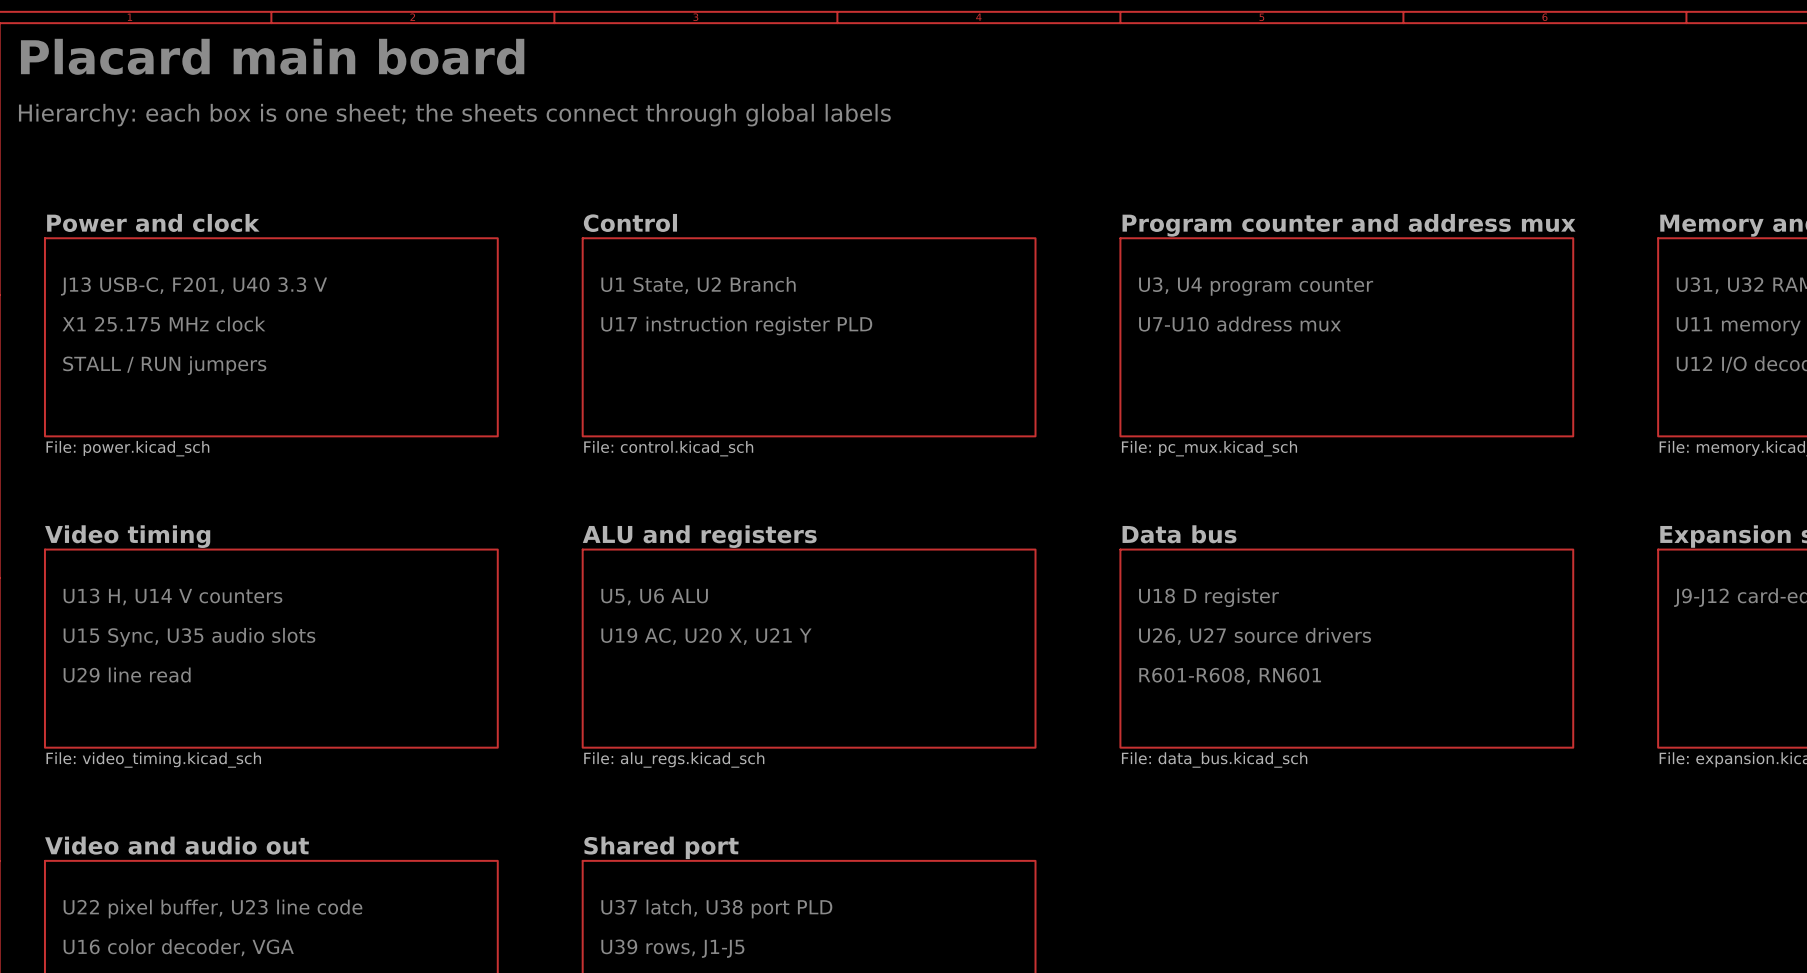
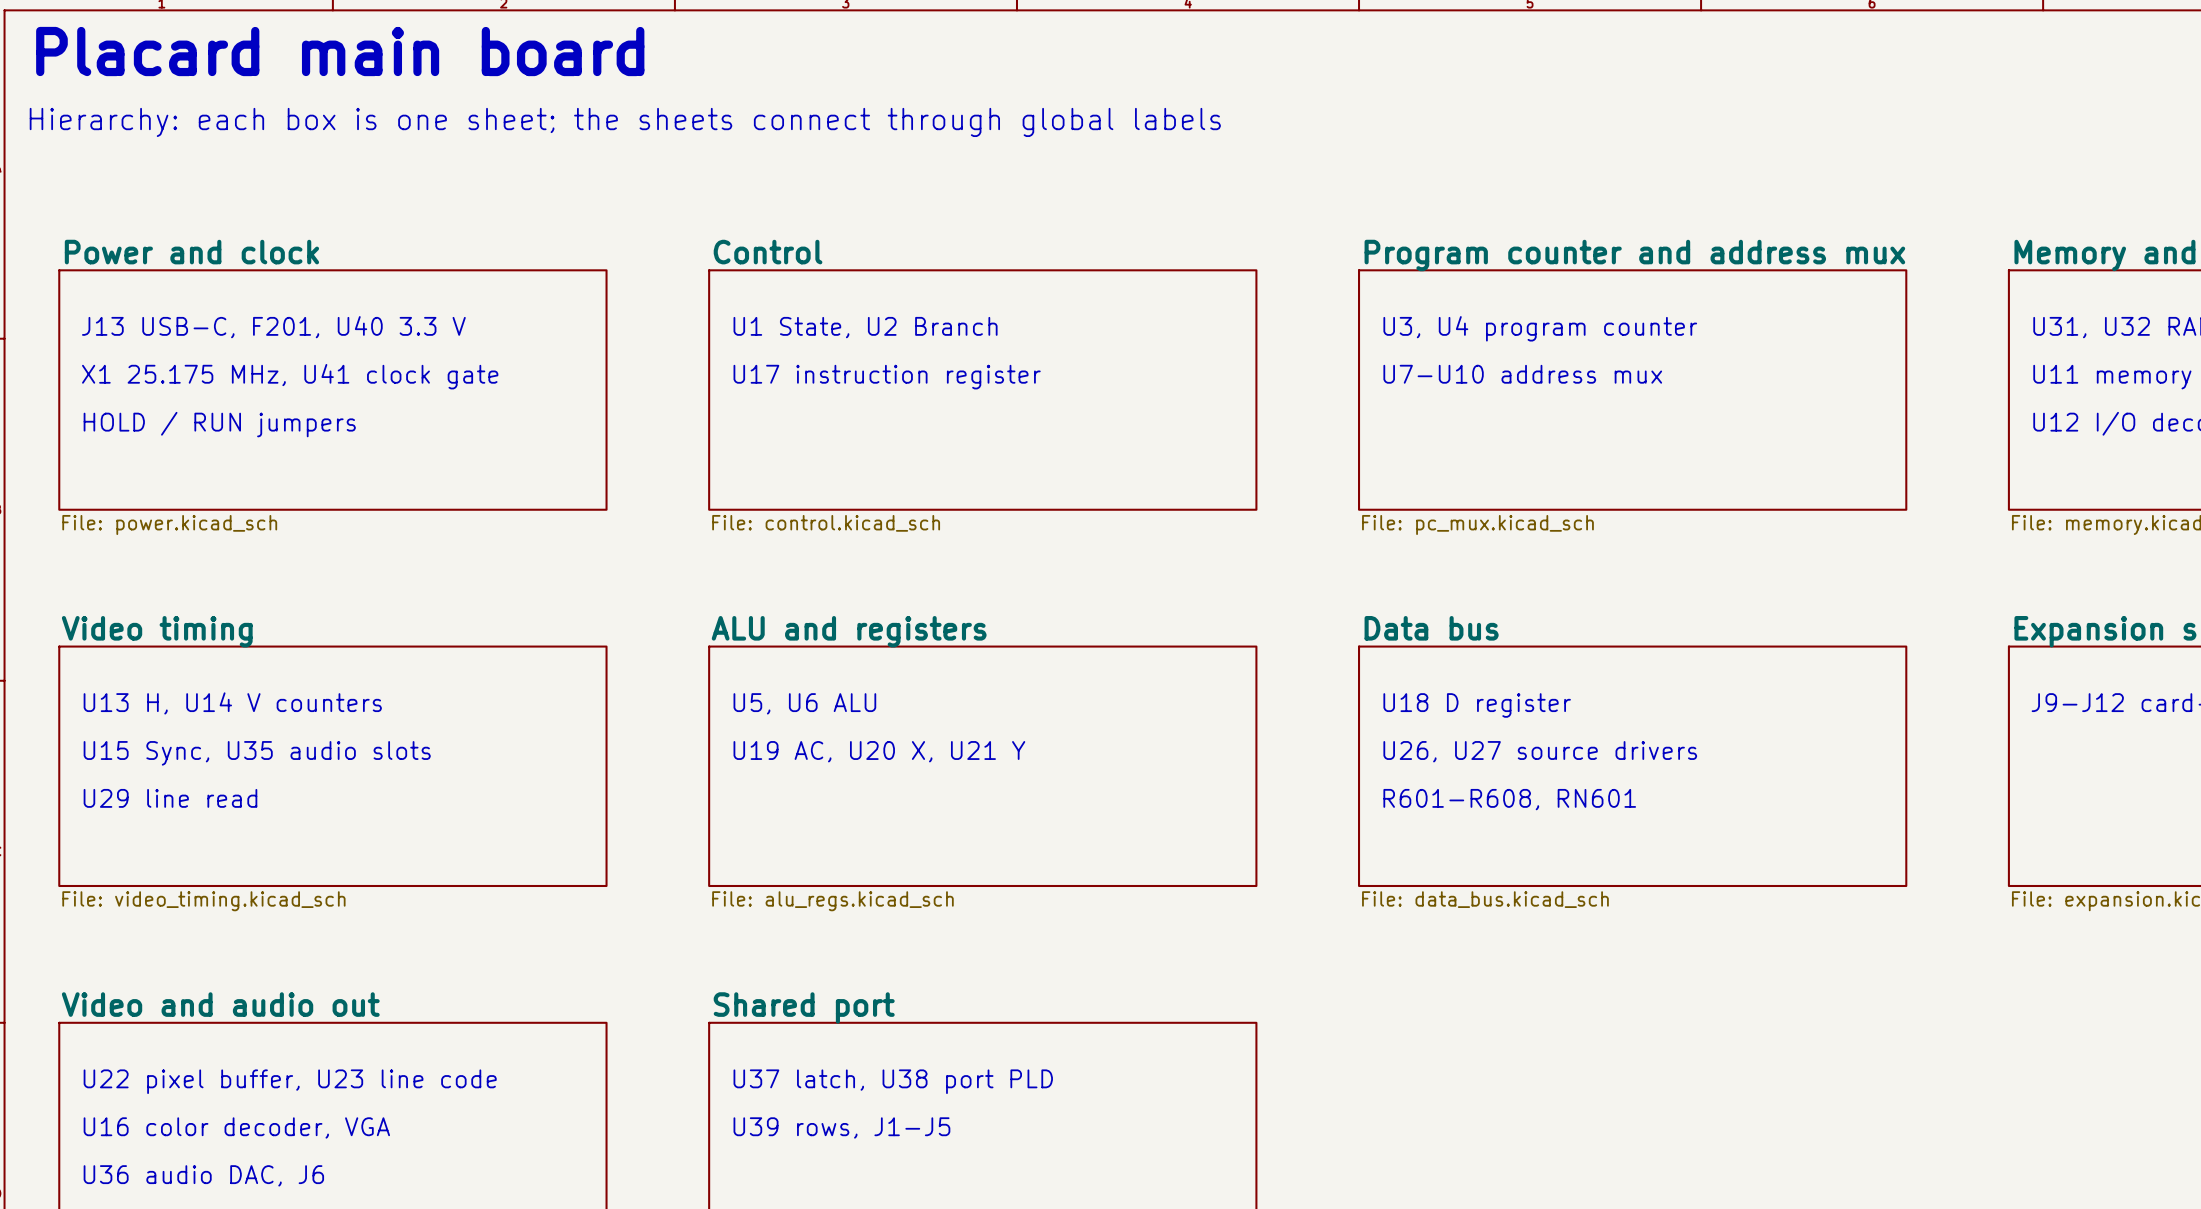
text: X1 25.175 MHz clock (163, 324) -> X1 25.175 MHz, U41 clock gate (290, 376)
text: U17 instruction register PLD (736, 325) -> U17 instruction register (887, 377)
text: STALL / RUN jumpers (164, 365) -> HOLD / RUN jumpers (219, 424)

